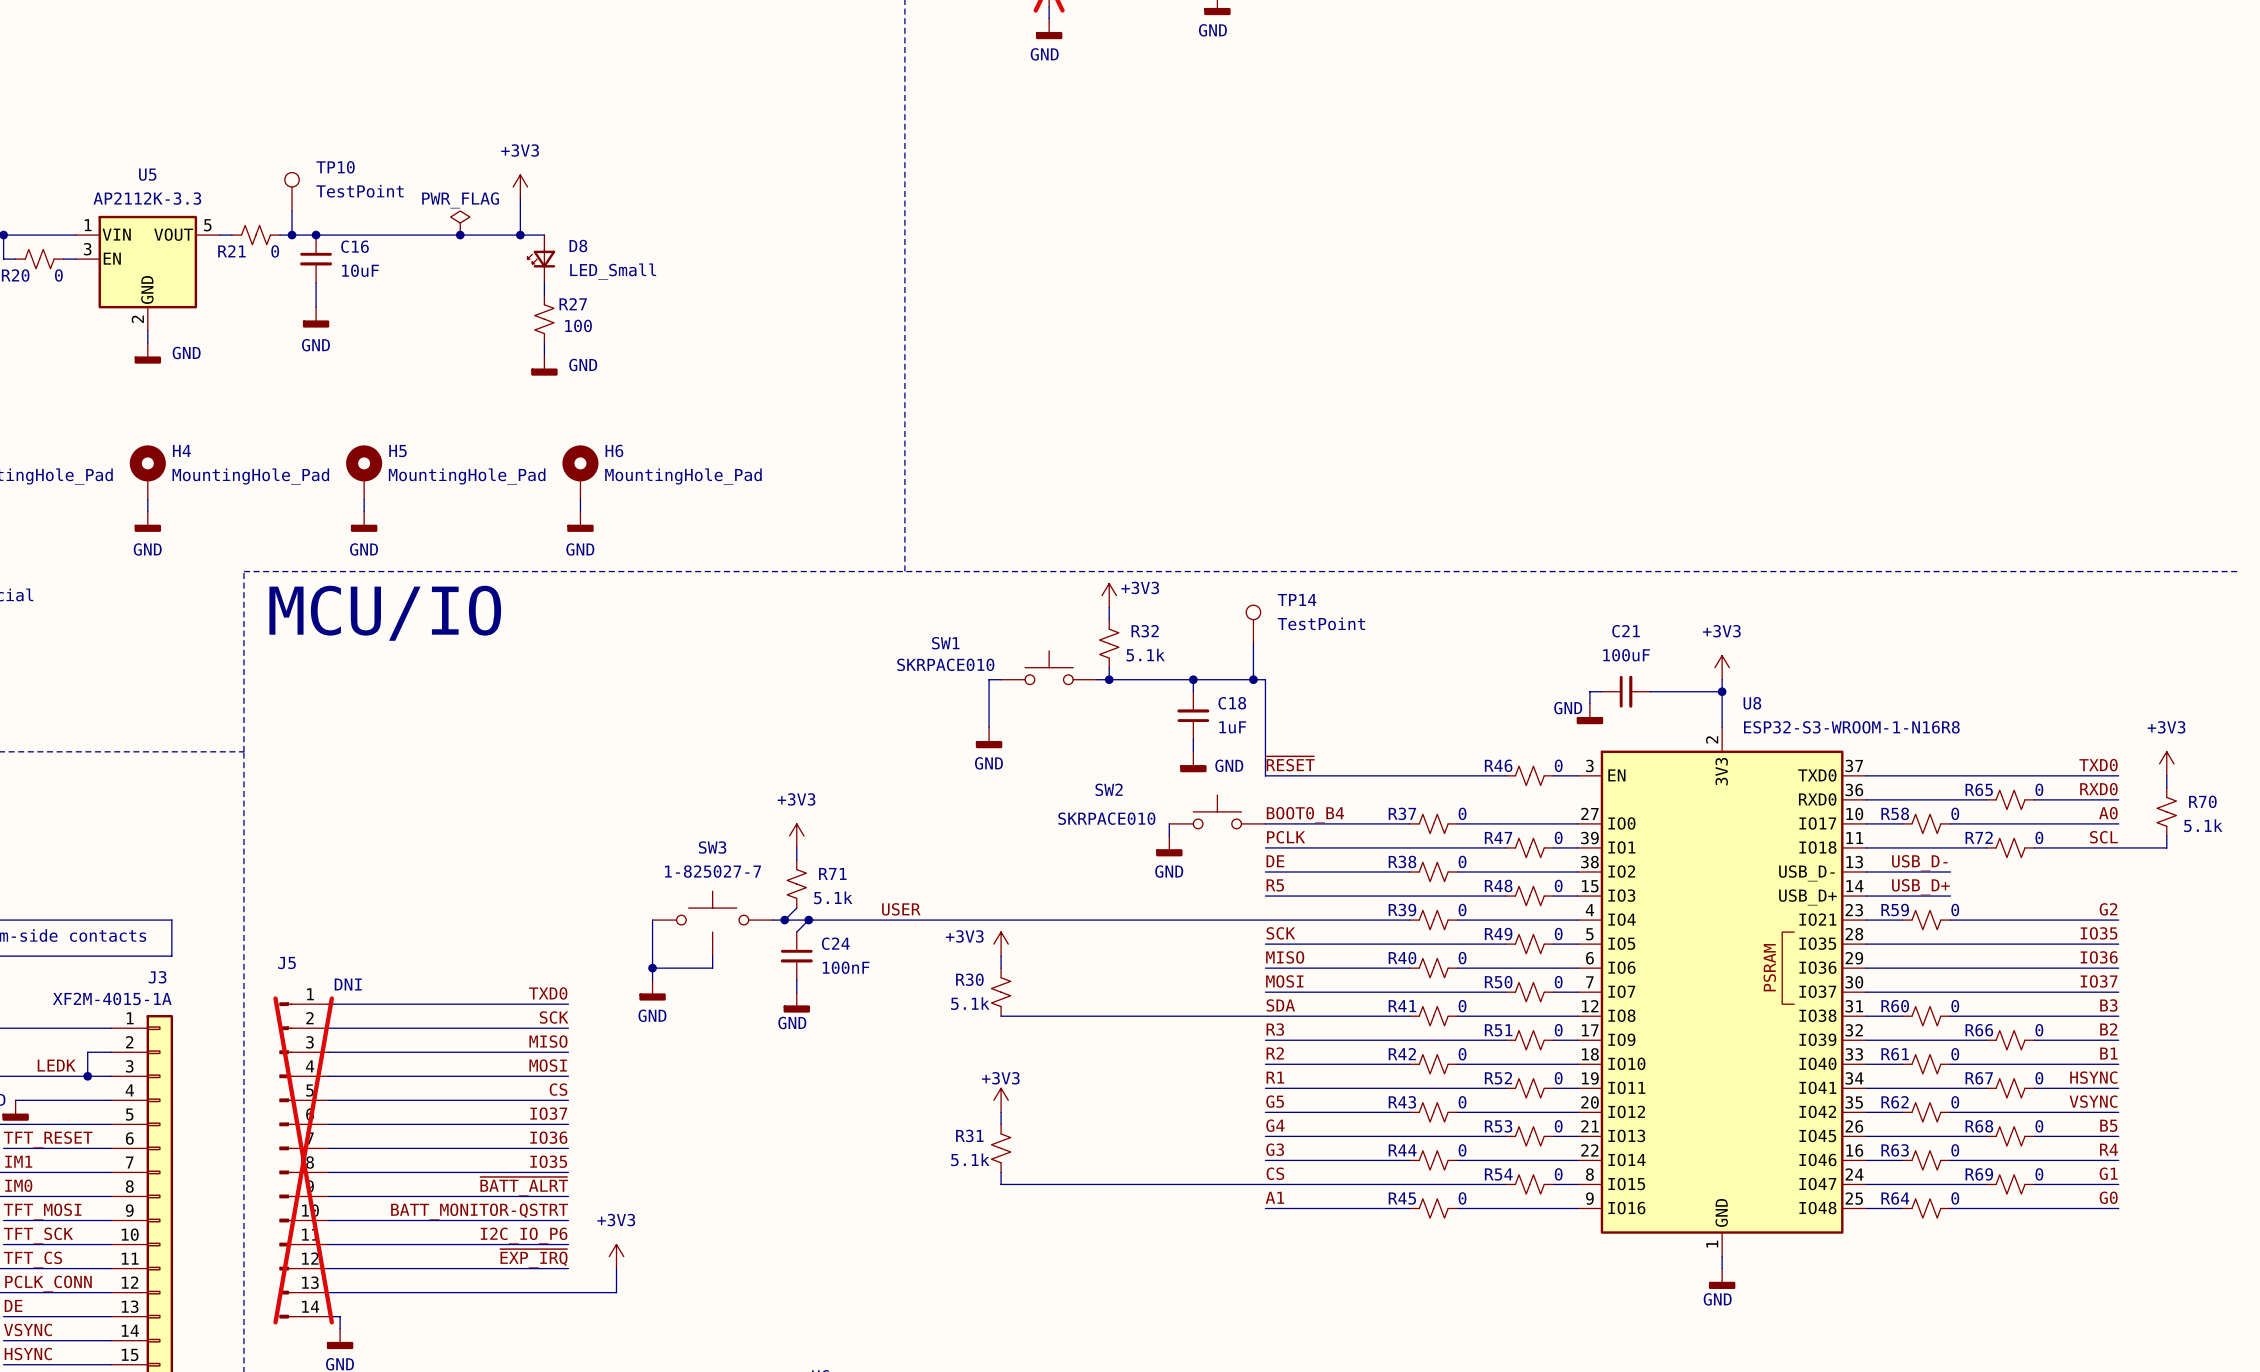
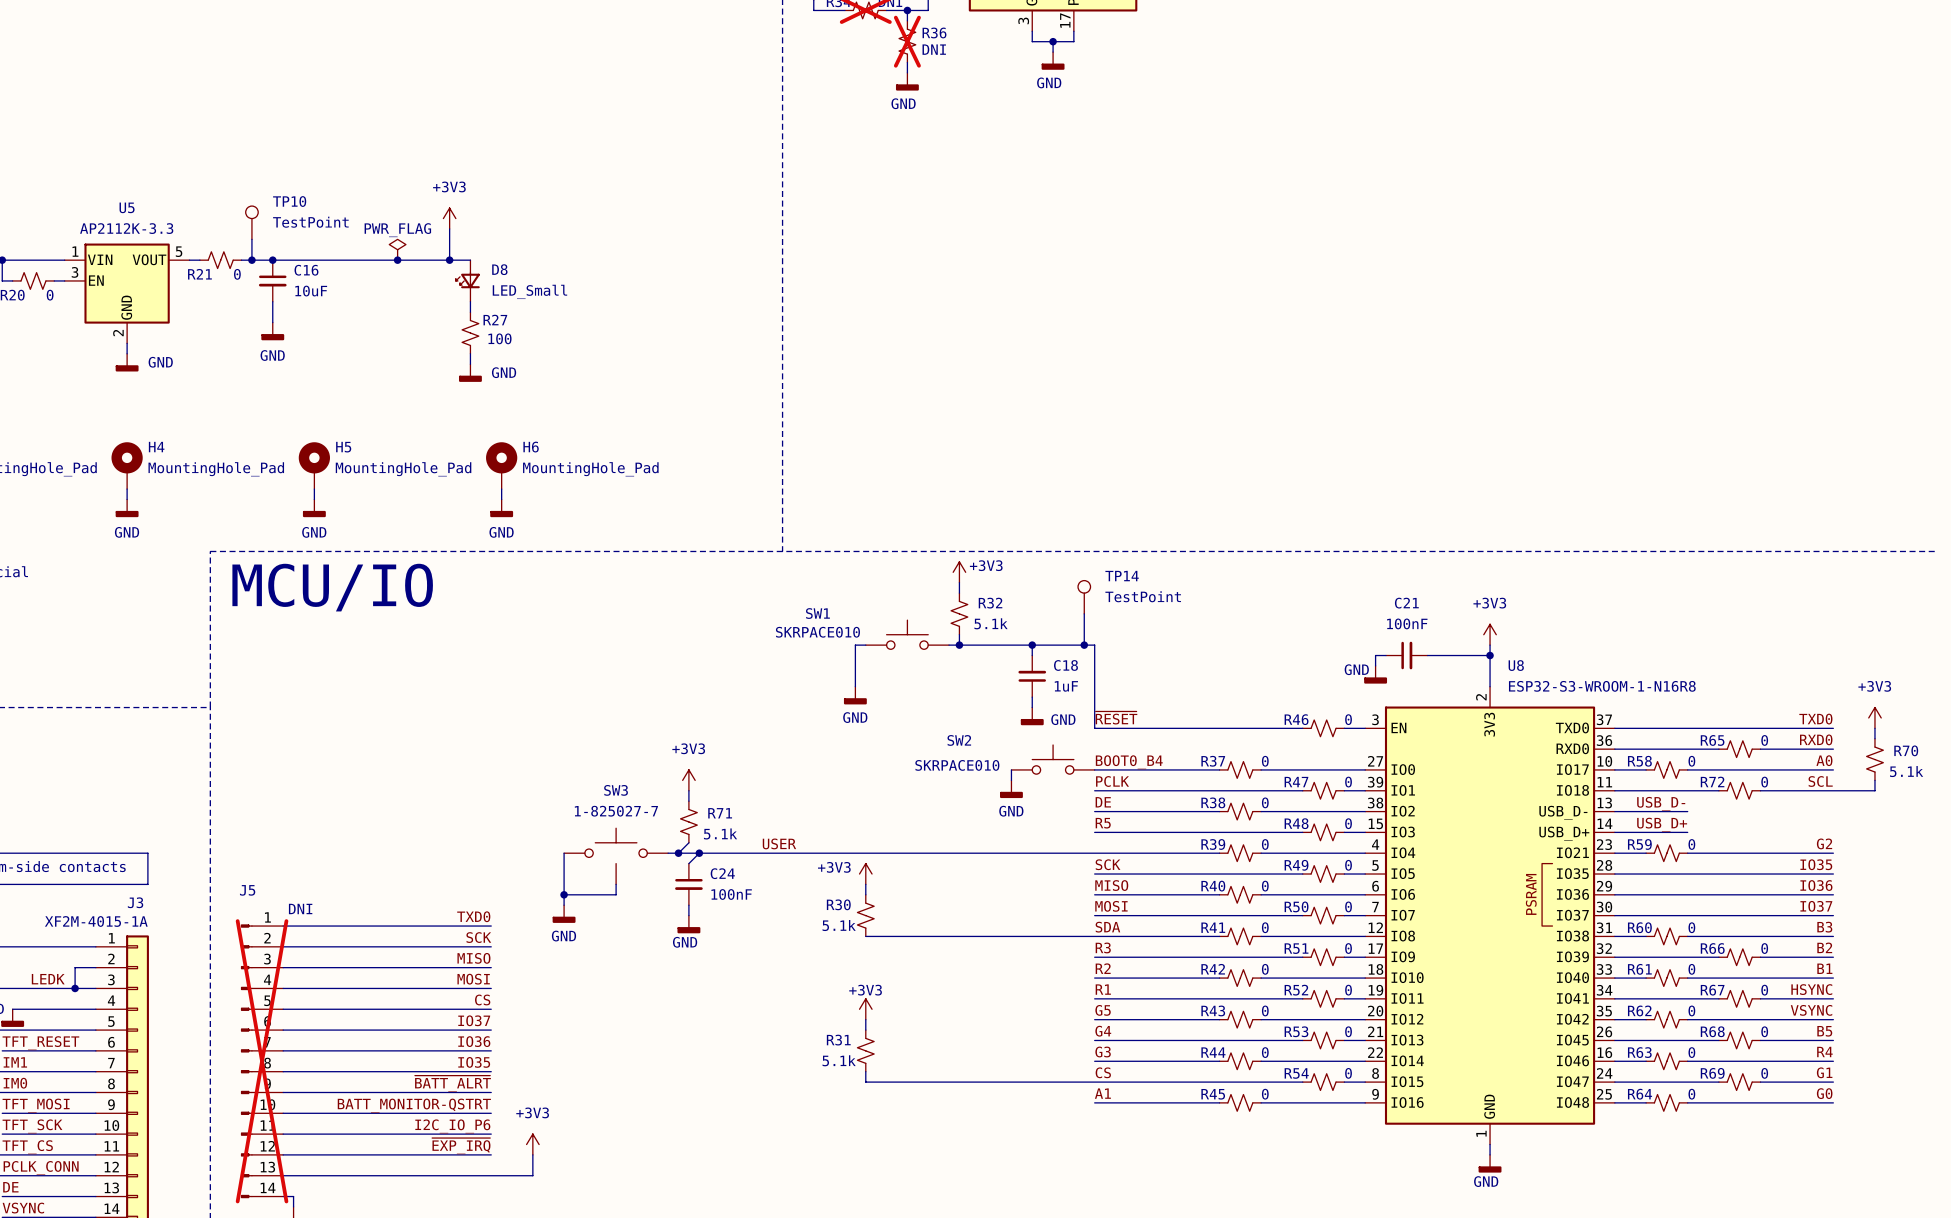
C21 value: 100uF (1626, 655) -> 100nF (1407, 623)

